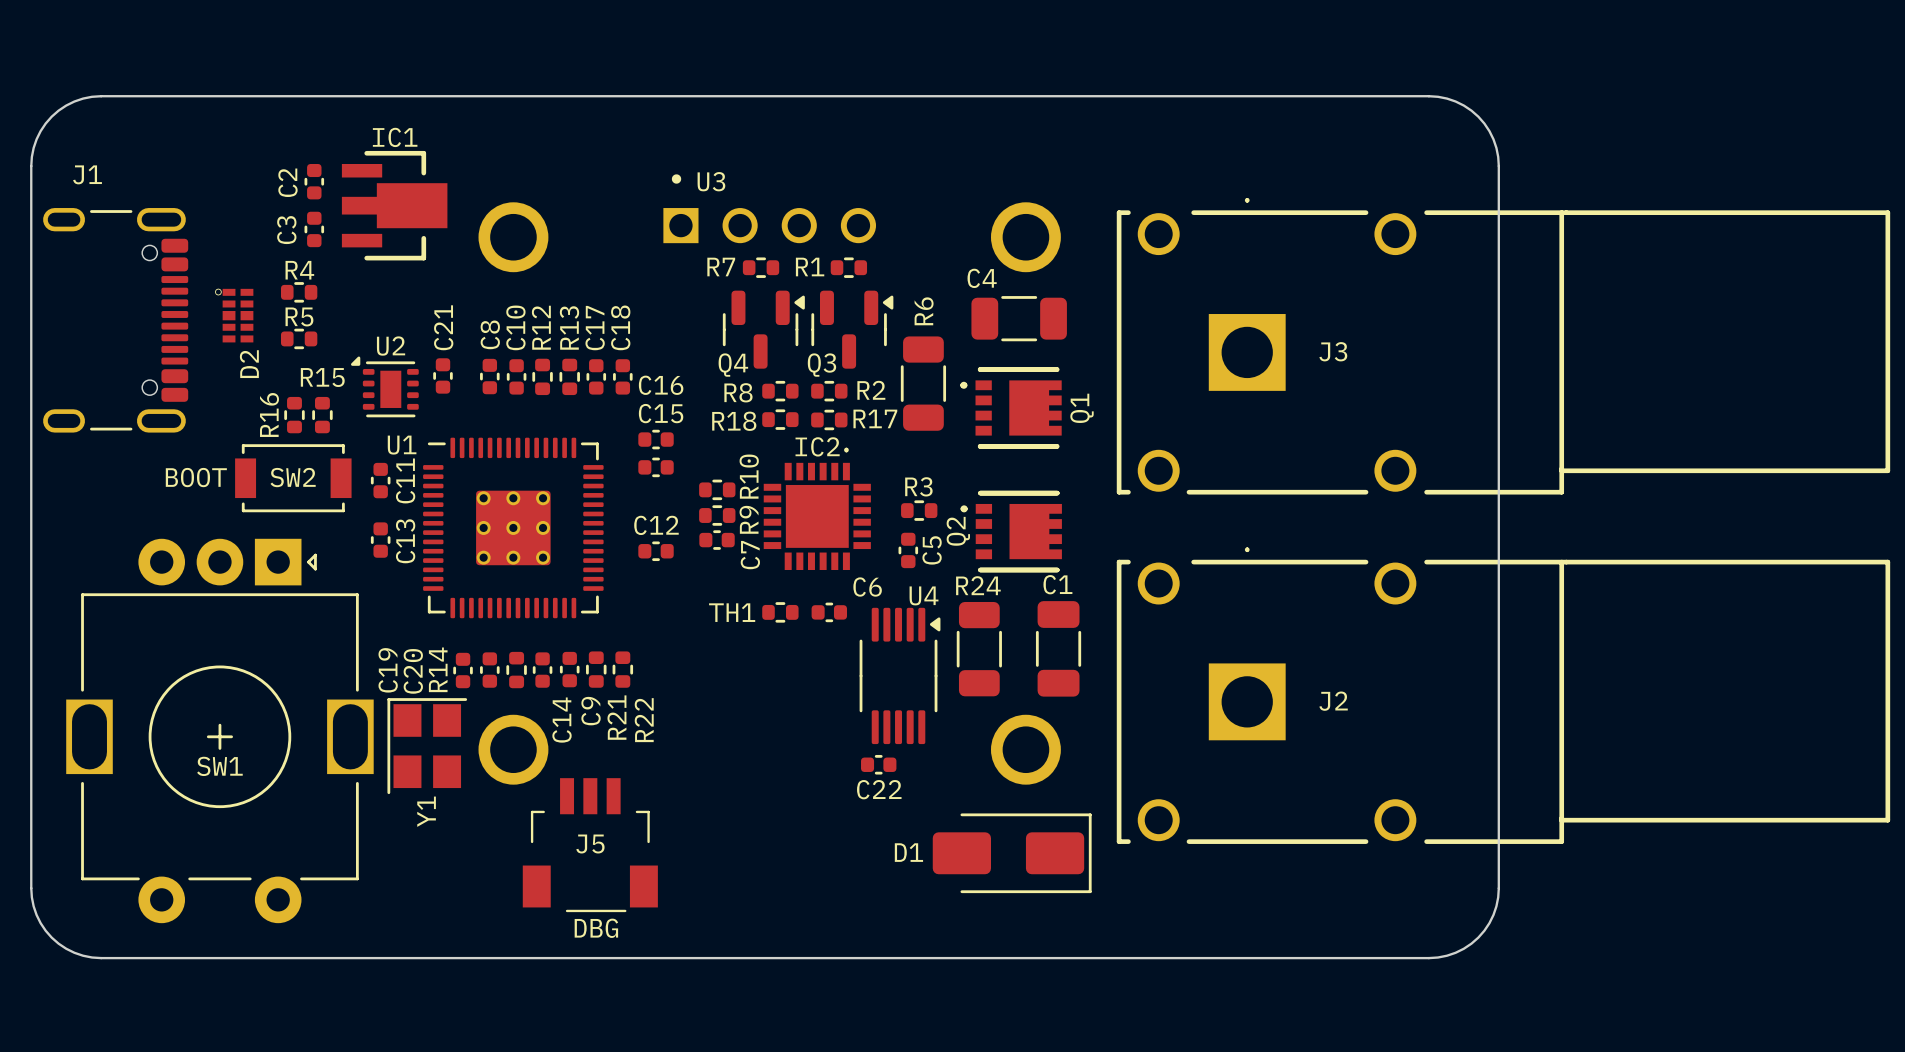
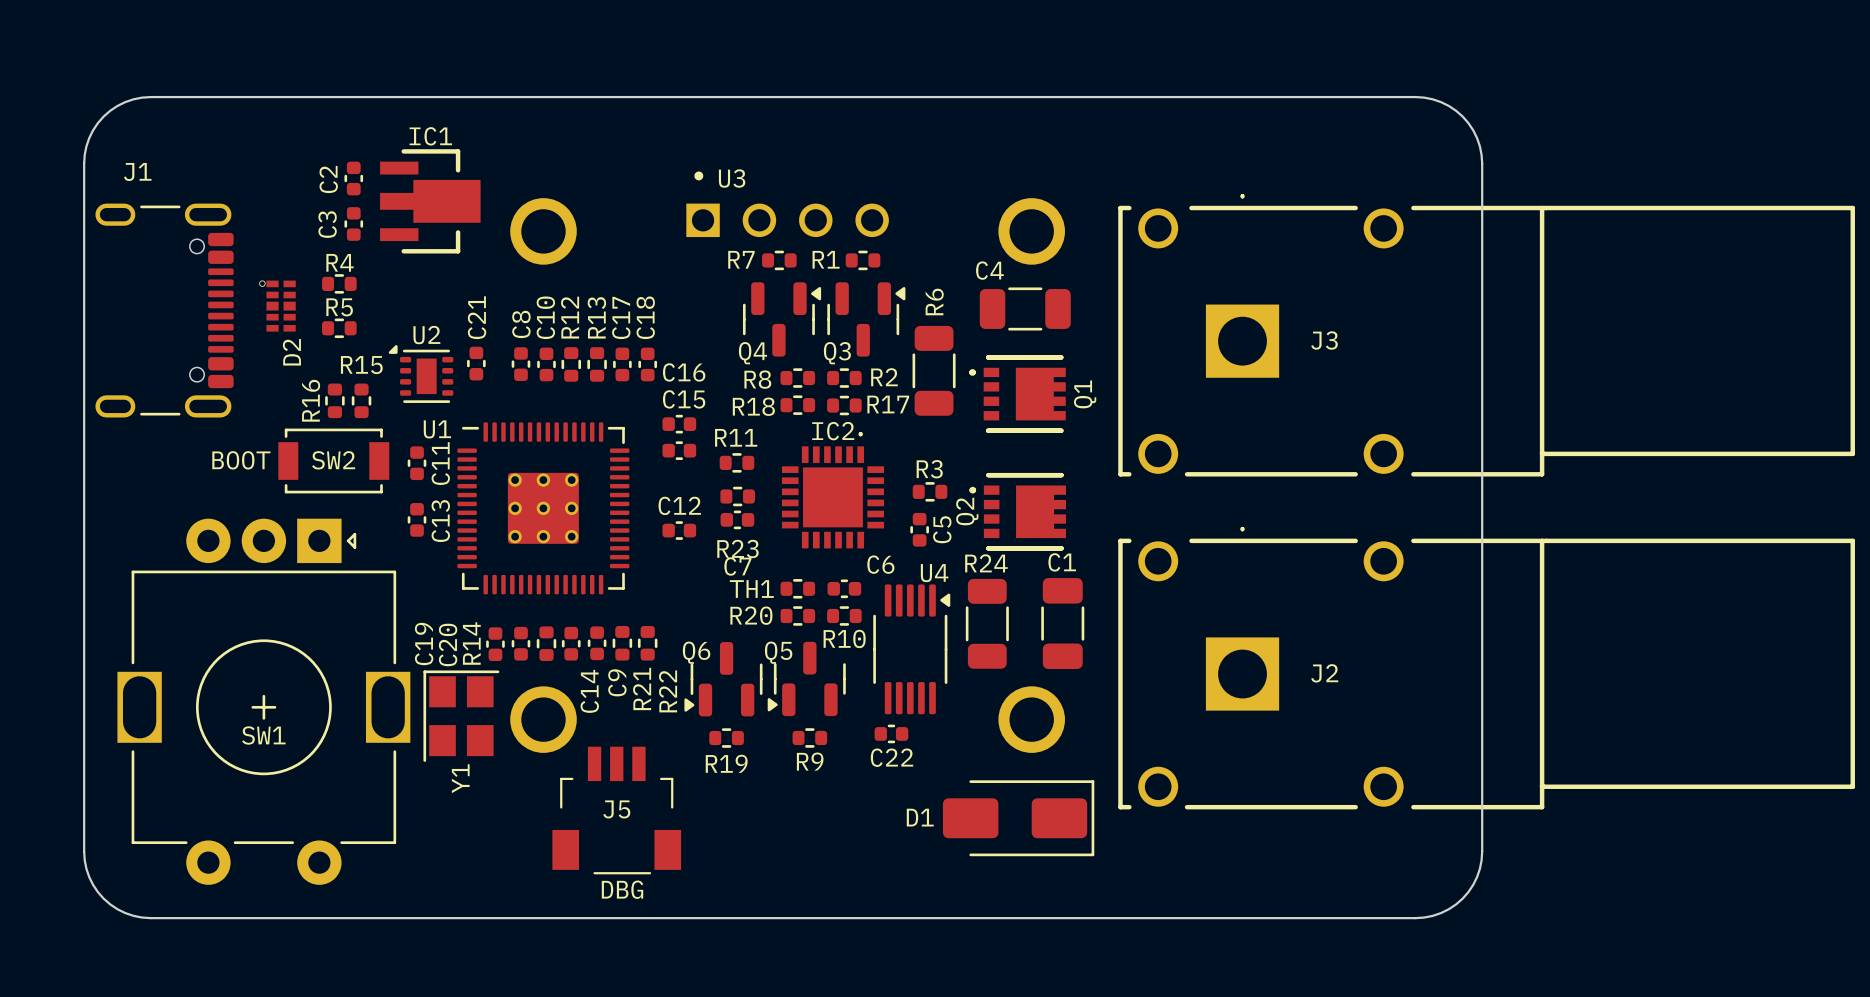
R10 name rotation: 0° (749, 476) -> 90° clockwise (844, 638)
R11: none -> (736, 462)
R10 position: (717, 489) -> (844, 615)
R9 name: R9 (749, 519) -> R23 (737, 548)
C7 name rotation: 0° (750, 555) -> 90° clockwise (737, 566)
C7 name position: C7 (750, 555) -> C7 (737, 566)
R20: none -> (797, 615)
Q6: none -> (723, 679)
Q5: none -> (806, 678)
R9: none -> (809, 737)
R19: none -> (726, 738)

